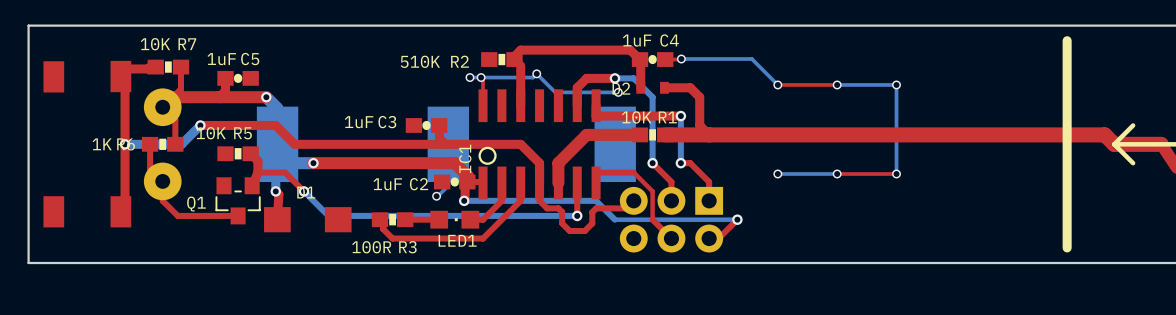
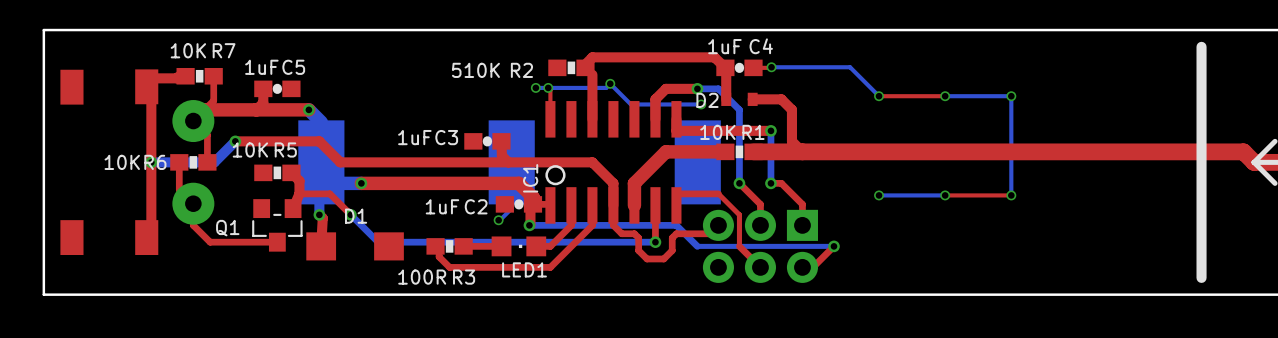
R6 value: 1K (102, 144) -> 10K (122, 162)

